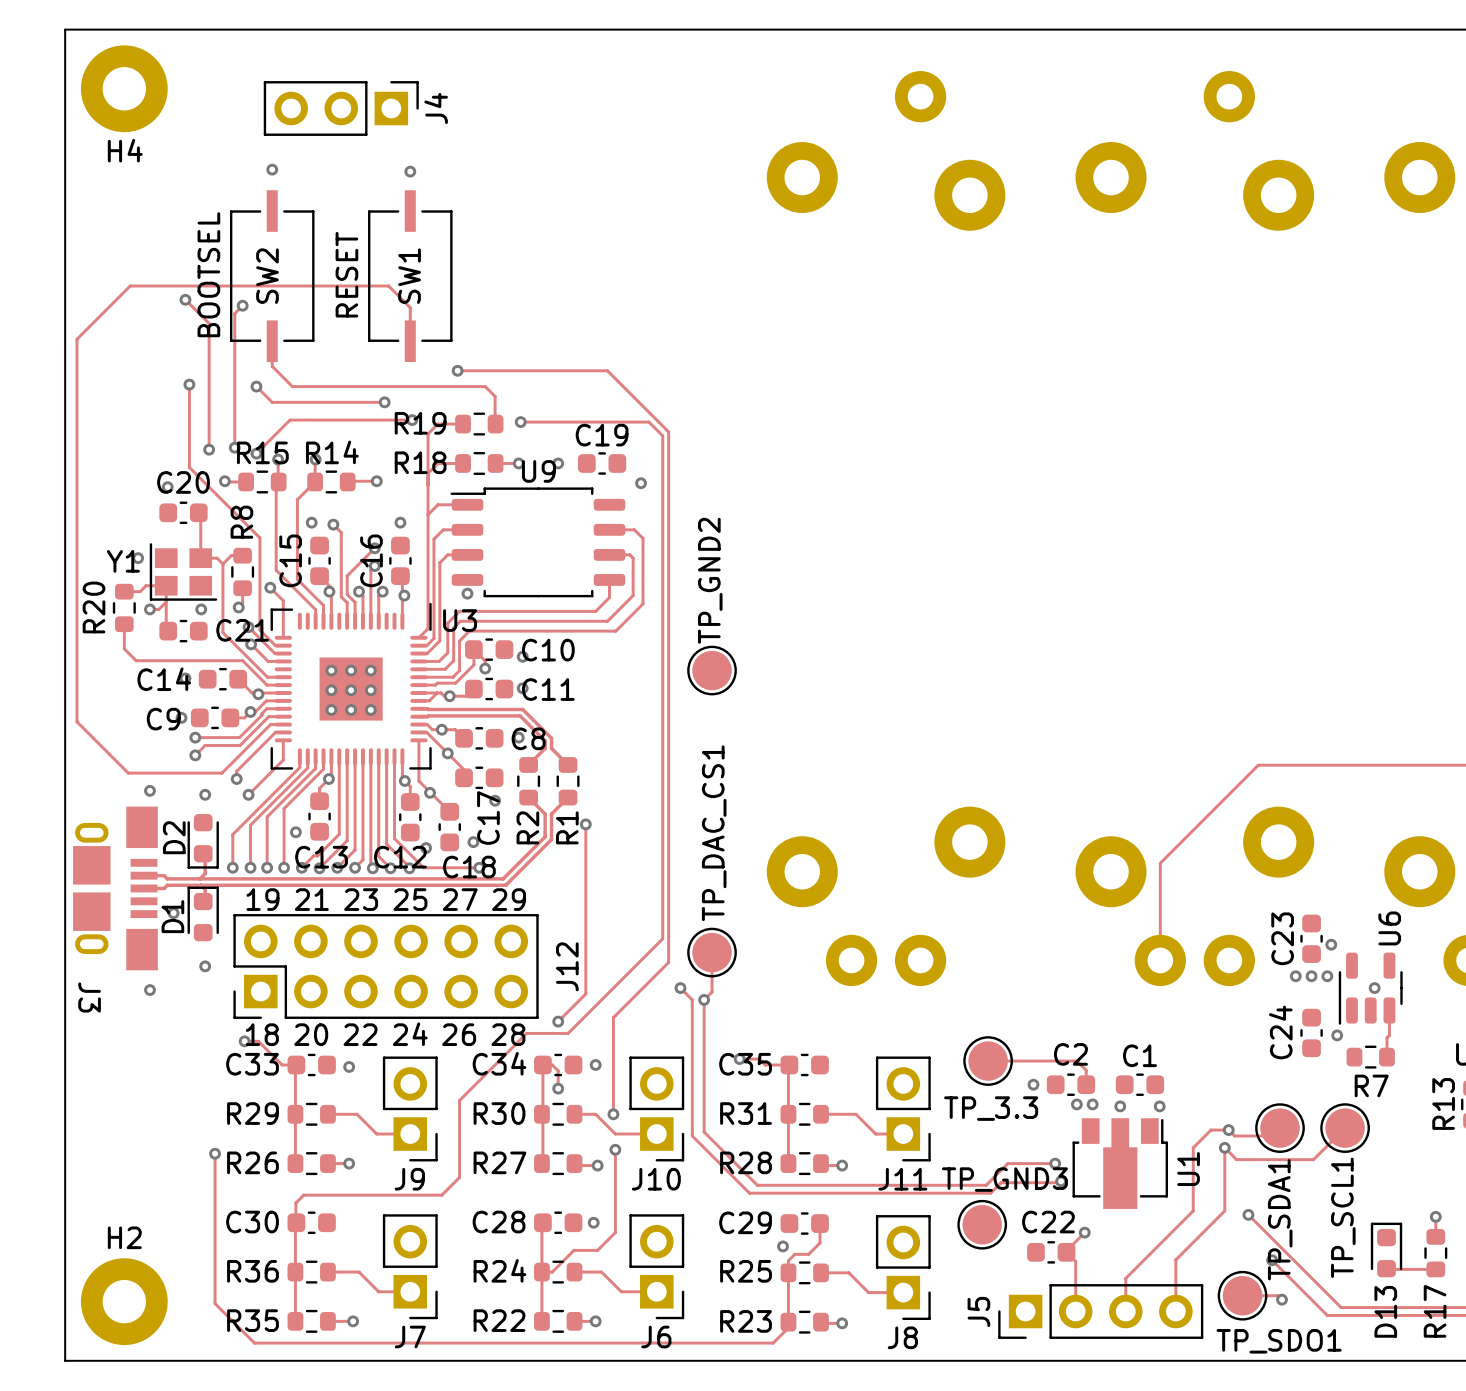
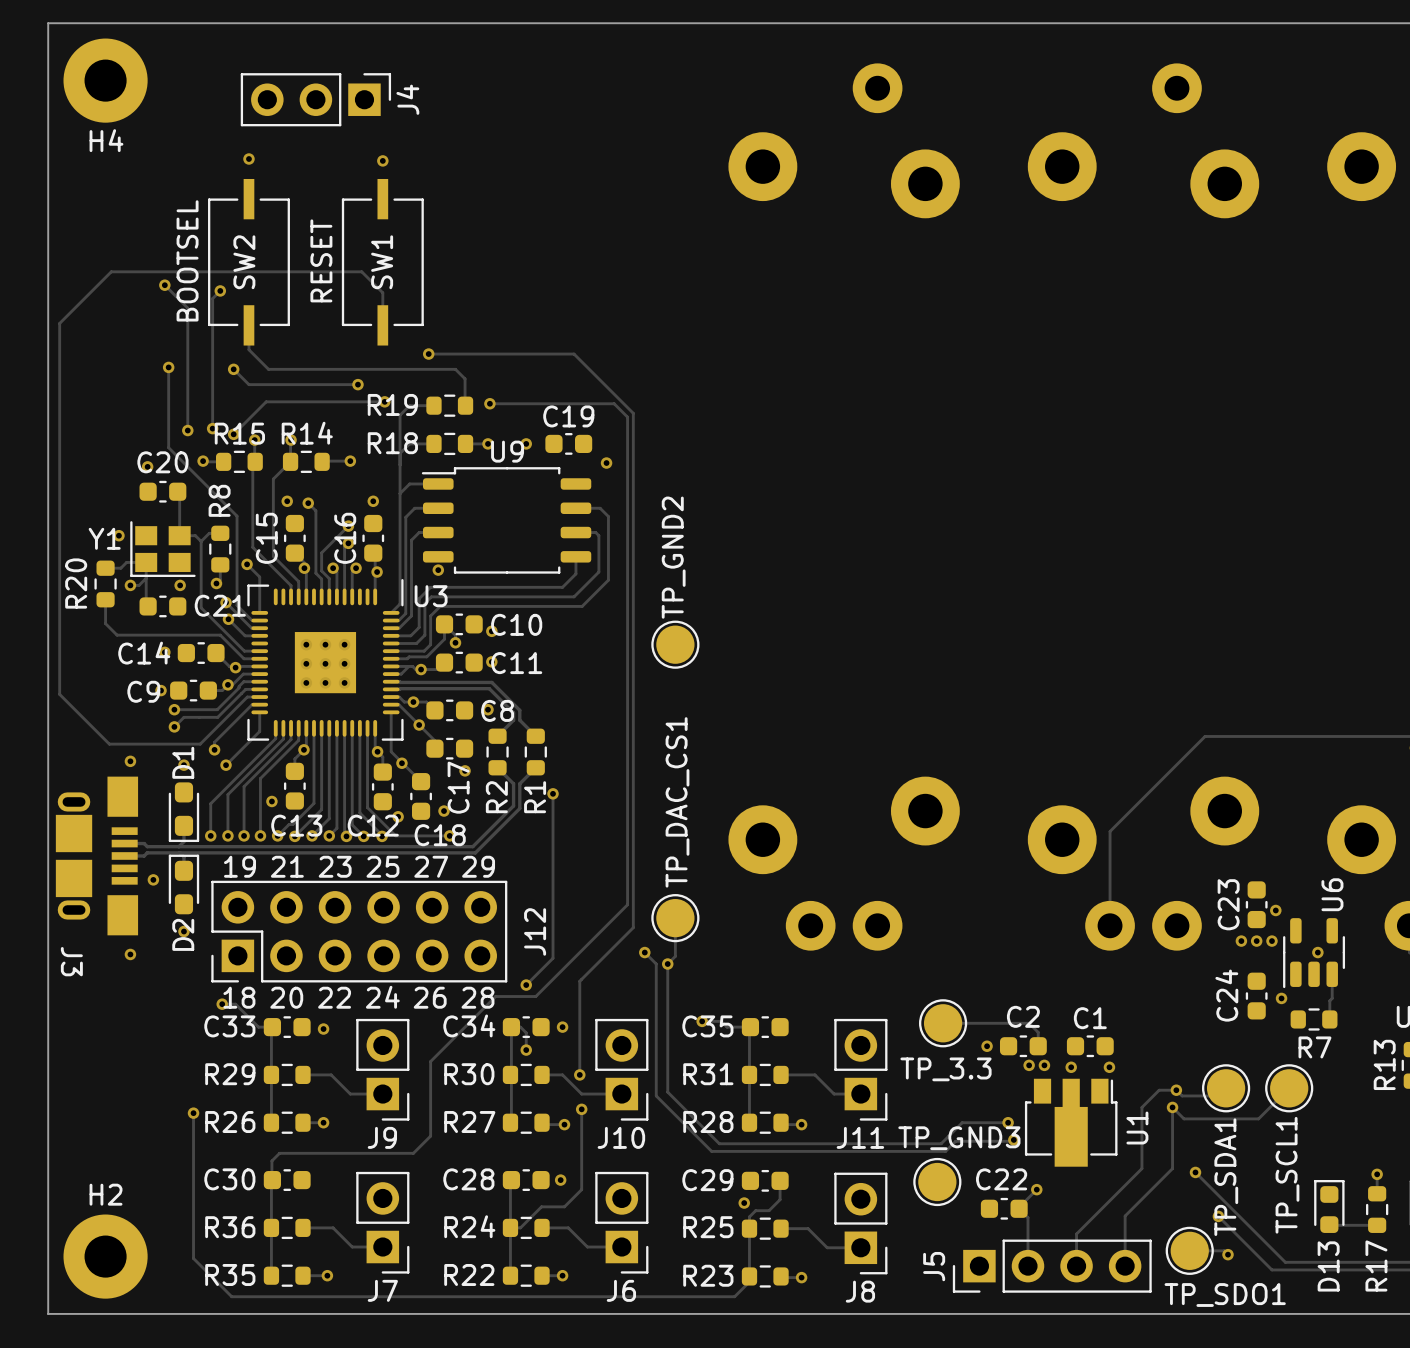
D2 footprint: [187, 814, 219, 869] -> [168, 854, 200, 915]
D2 name position: D2 (174, 837) -> D2 (183, 934)
D1 footprint: [187, 886, 219, 942] -> [168, 782, 200, 843]
D1 name position: D1 (172, 916) -> D1 (183, 762)

